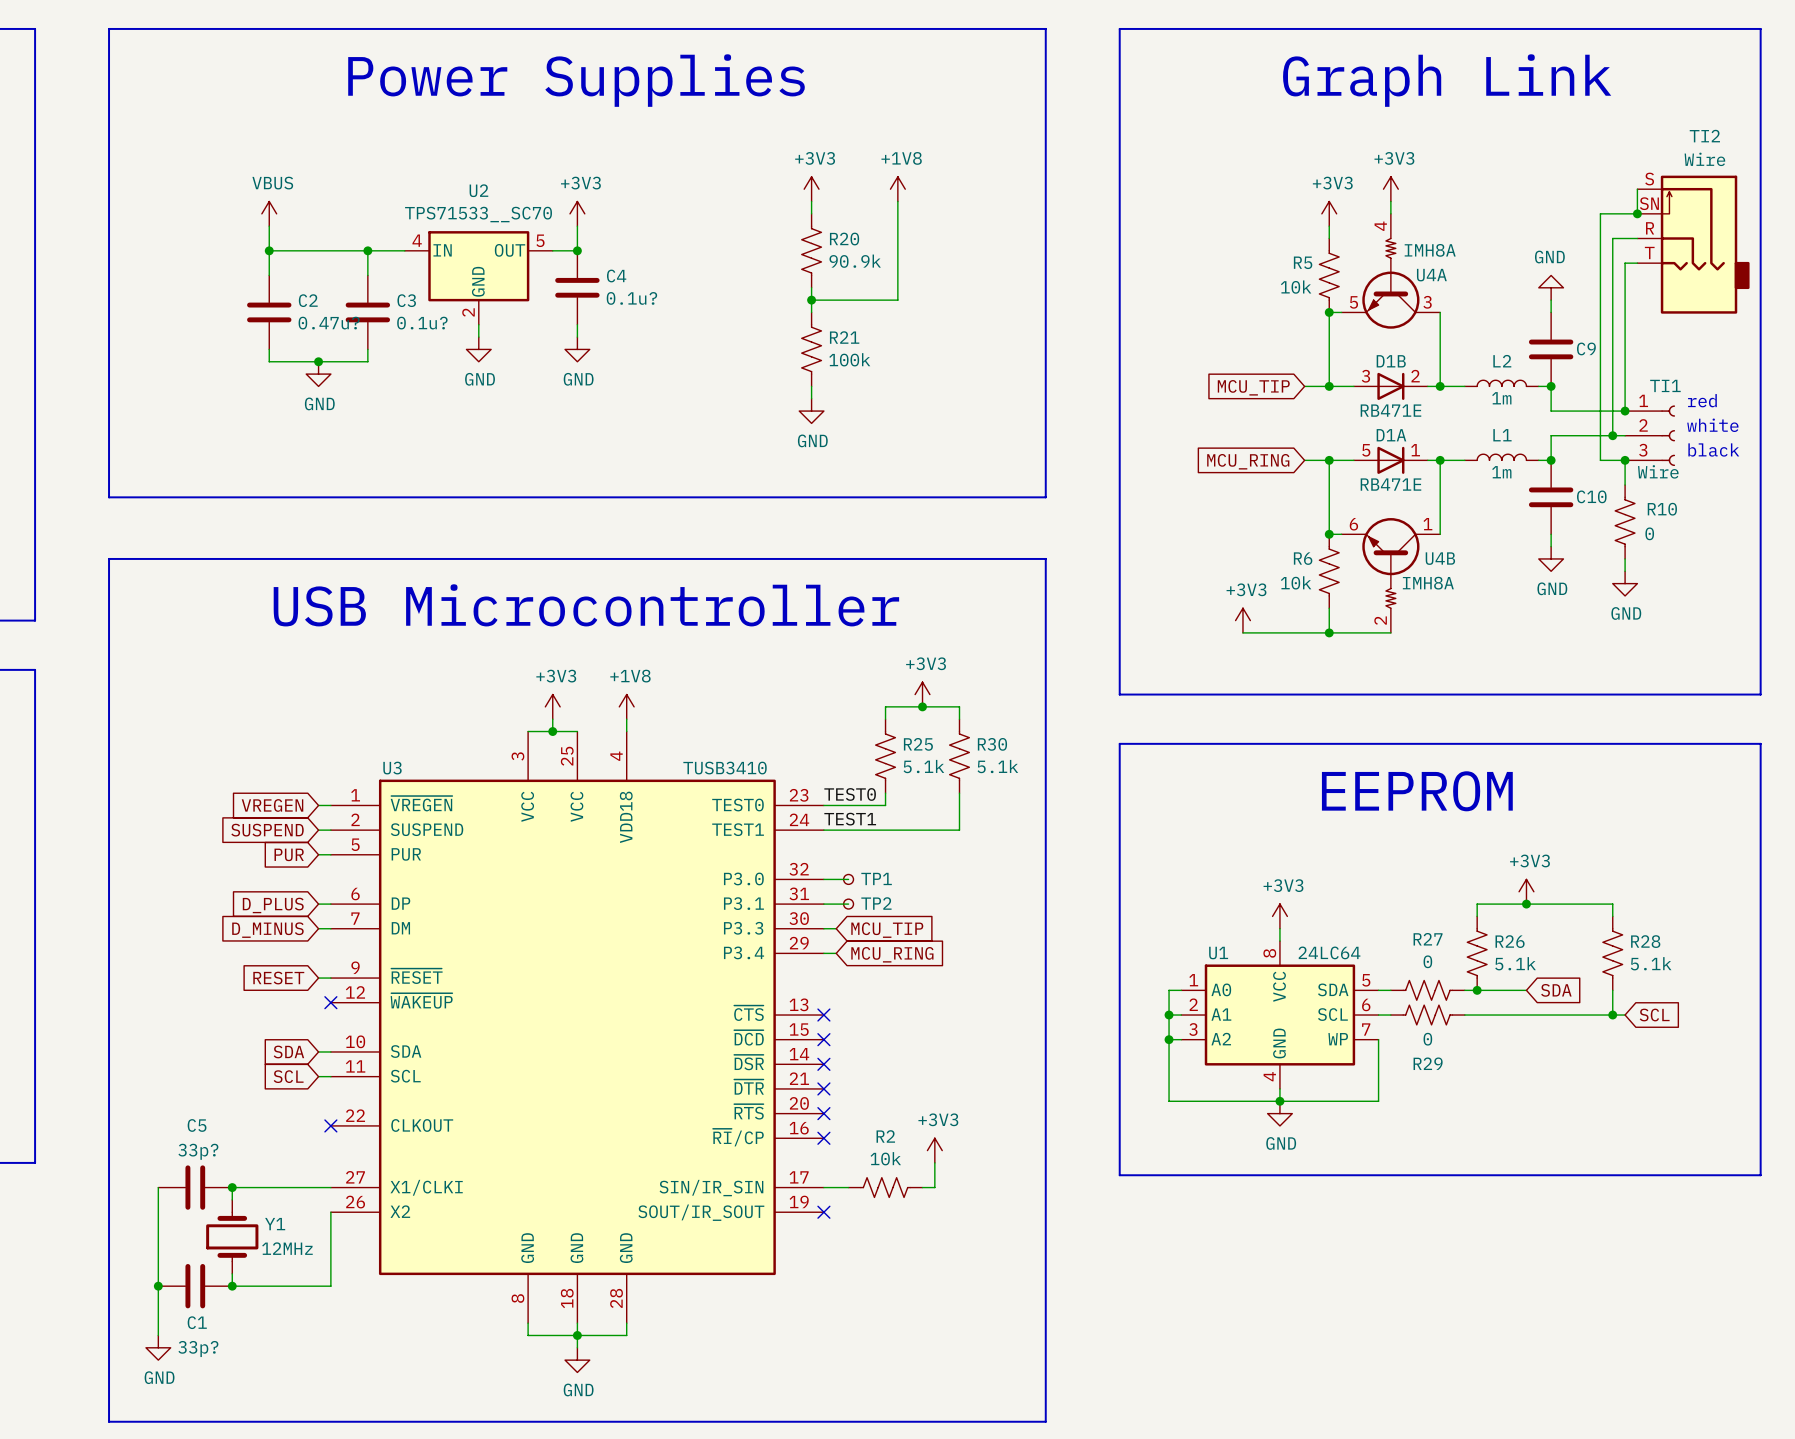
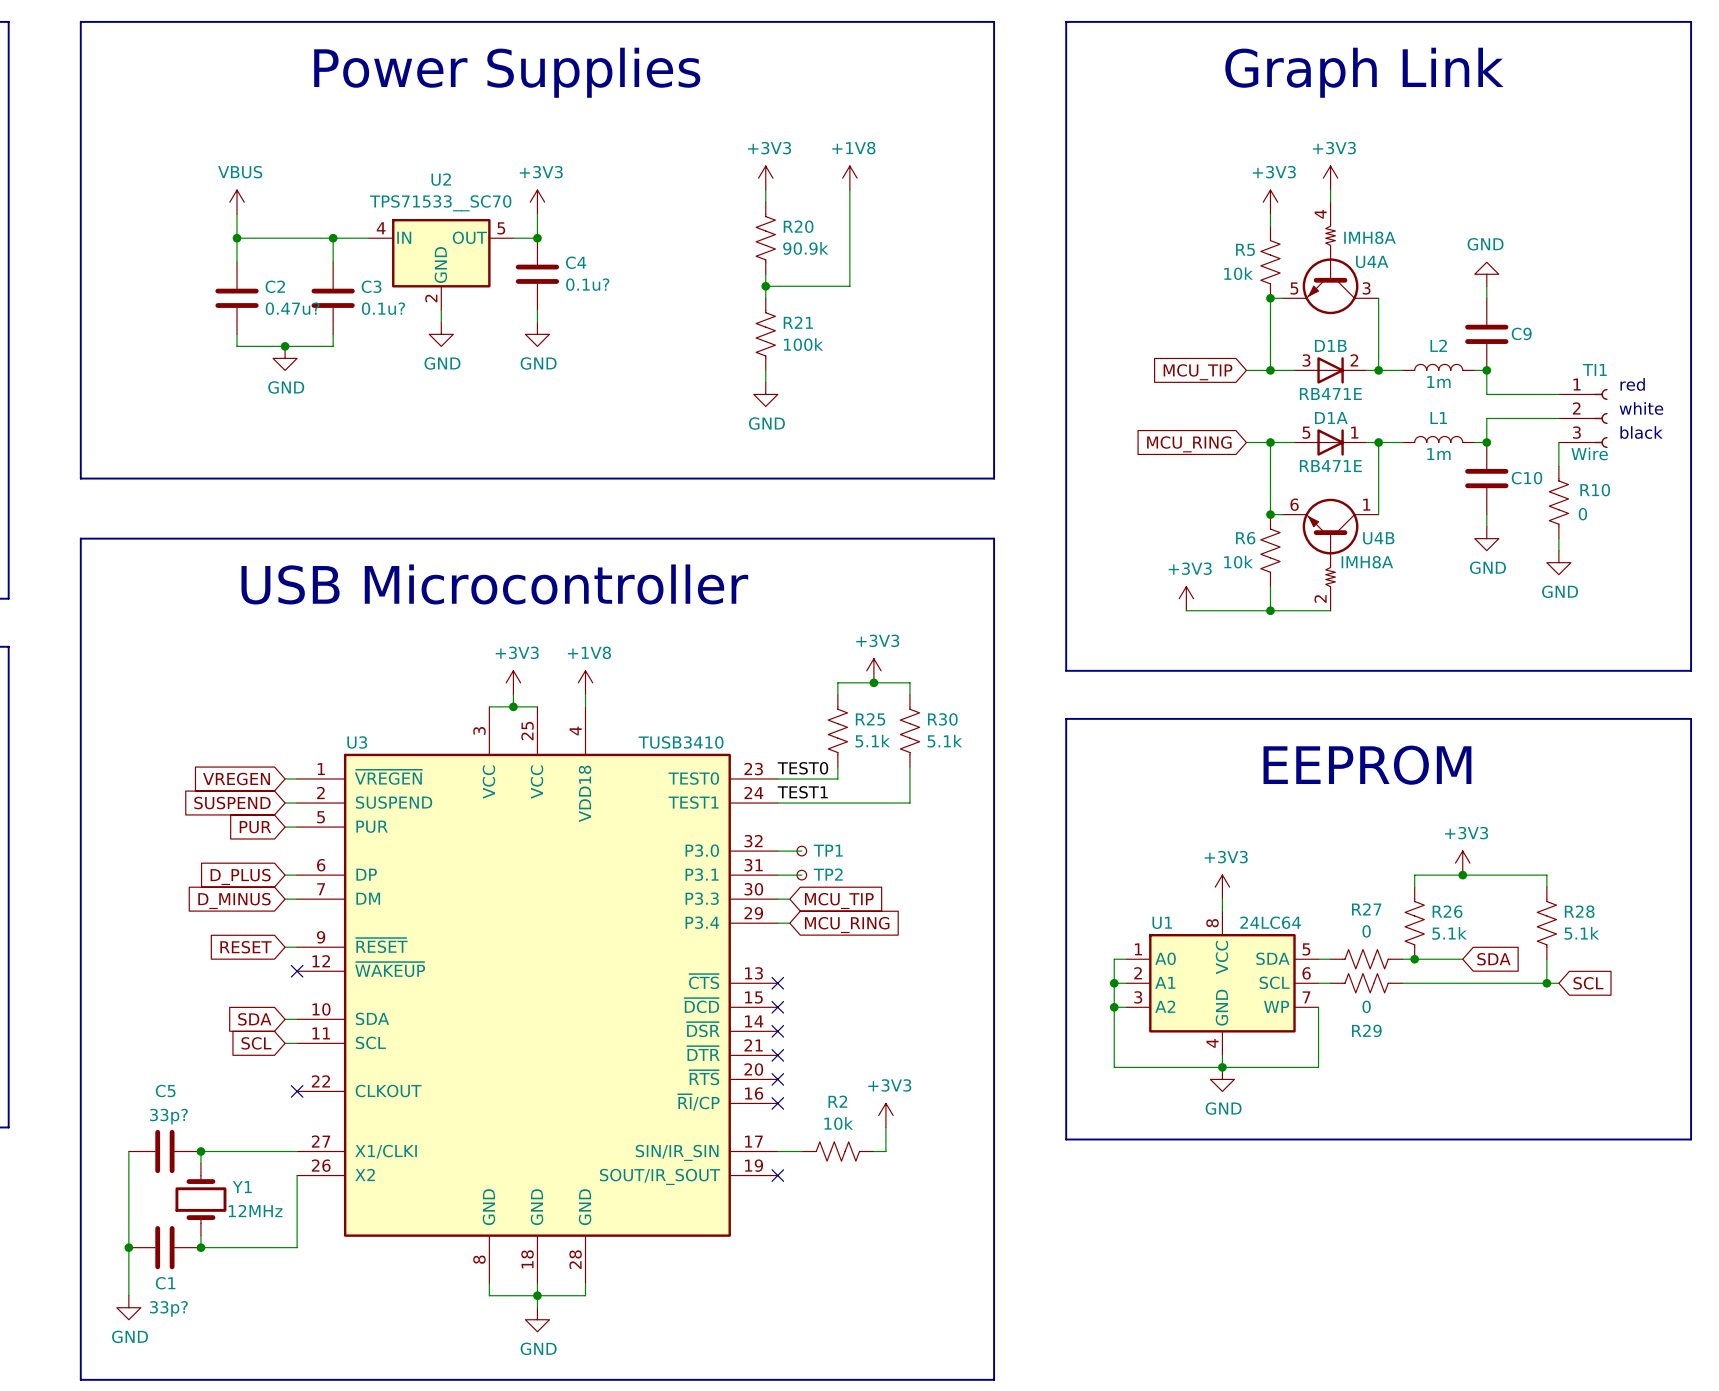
wire: (1637, 189) (1637, 213) (1600, 213) (1600, 460) (1625, 460) -> none
junction: (1637, 213) -> none
wire: (1637, 238) (1612, 238) (1612, 435) -> none
TI2: Wire (1693, 244) -> none
wire: (1637, 263) (1625, 263) (1625, 411) -> none
junction: (1625, 411) -> none
junction: (1612, 435) -> none
junction: (1625, 460) -> none

